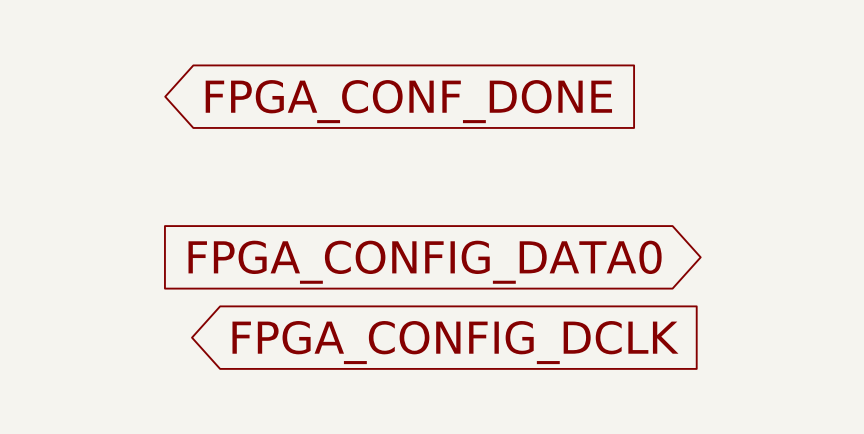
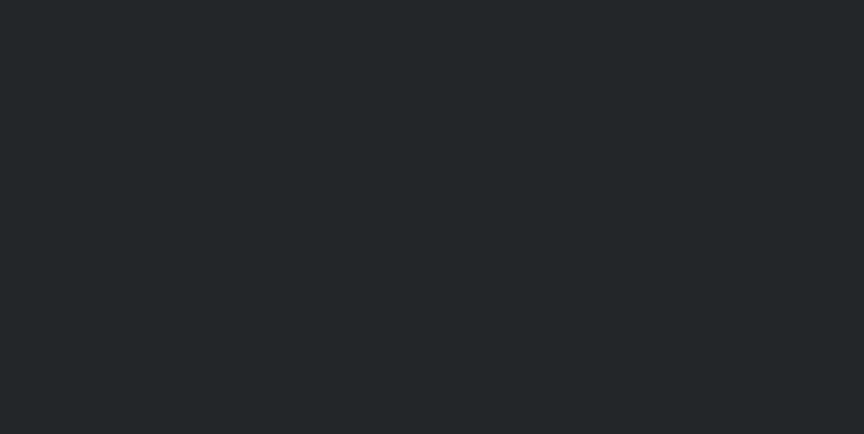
global label: FPGA_CONF_DONE (408, 101) -> none
global label: FPGA_CONFIG_DATA0 (425, 262) -> none
global label: FPGA_CONFIG_DCLK (455, 342) -> none

